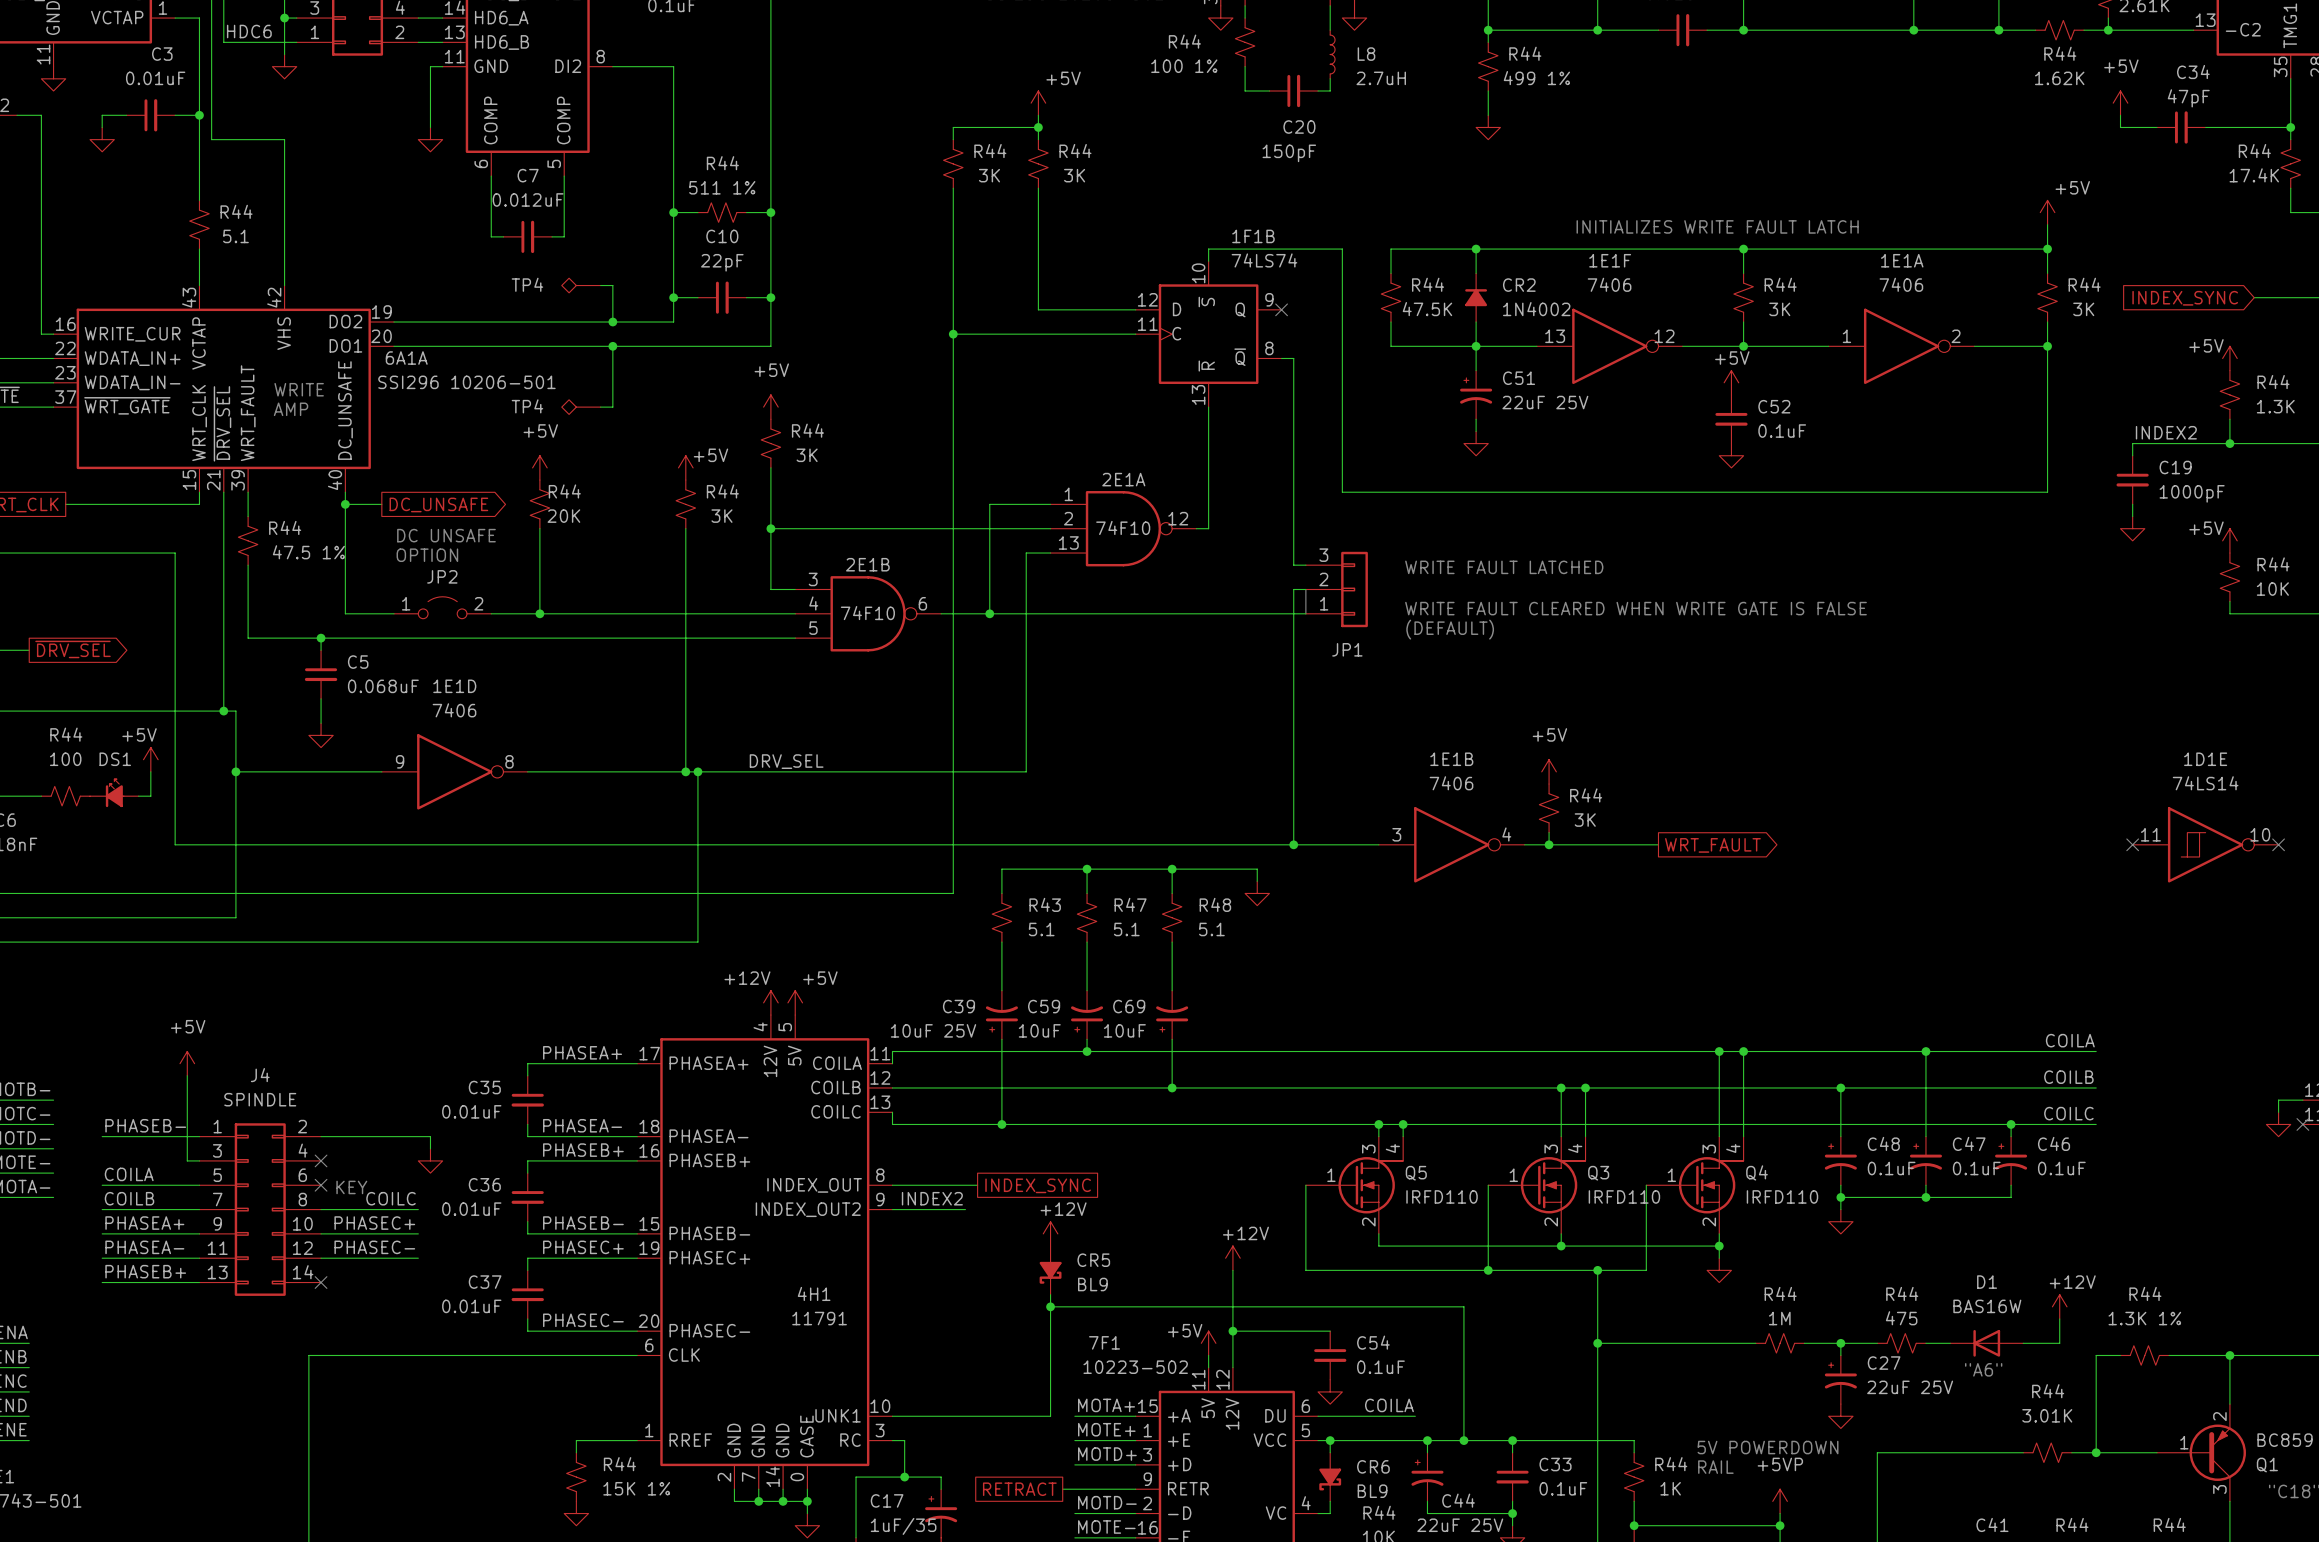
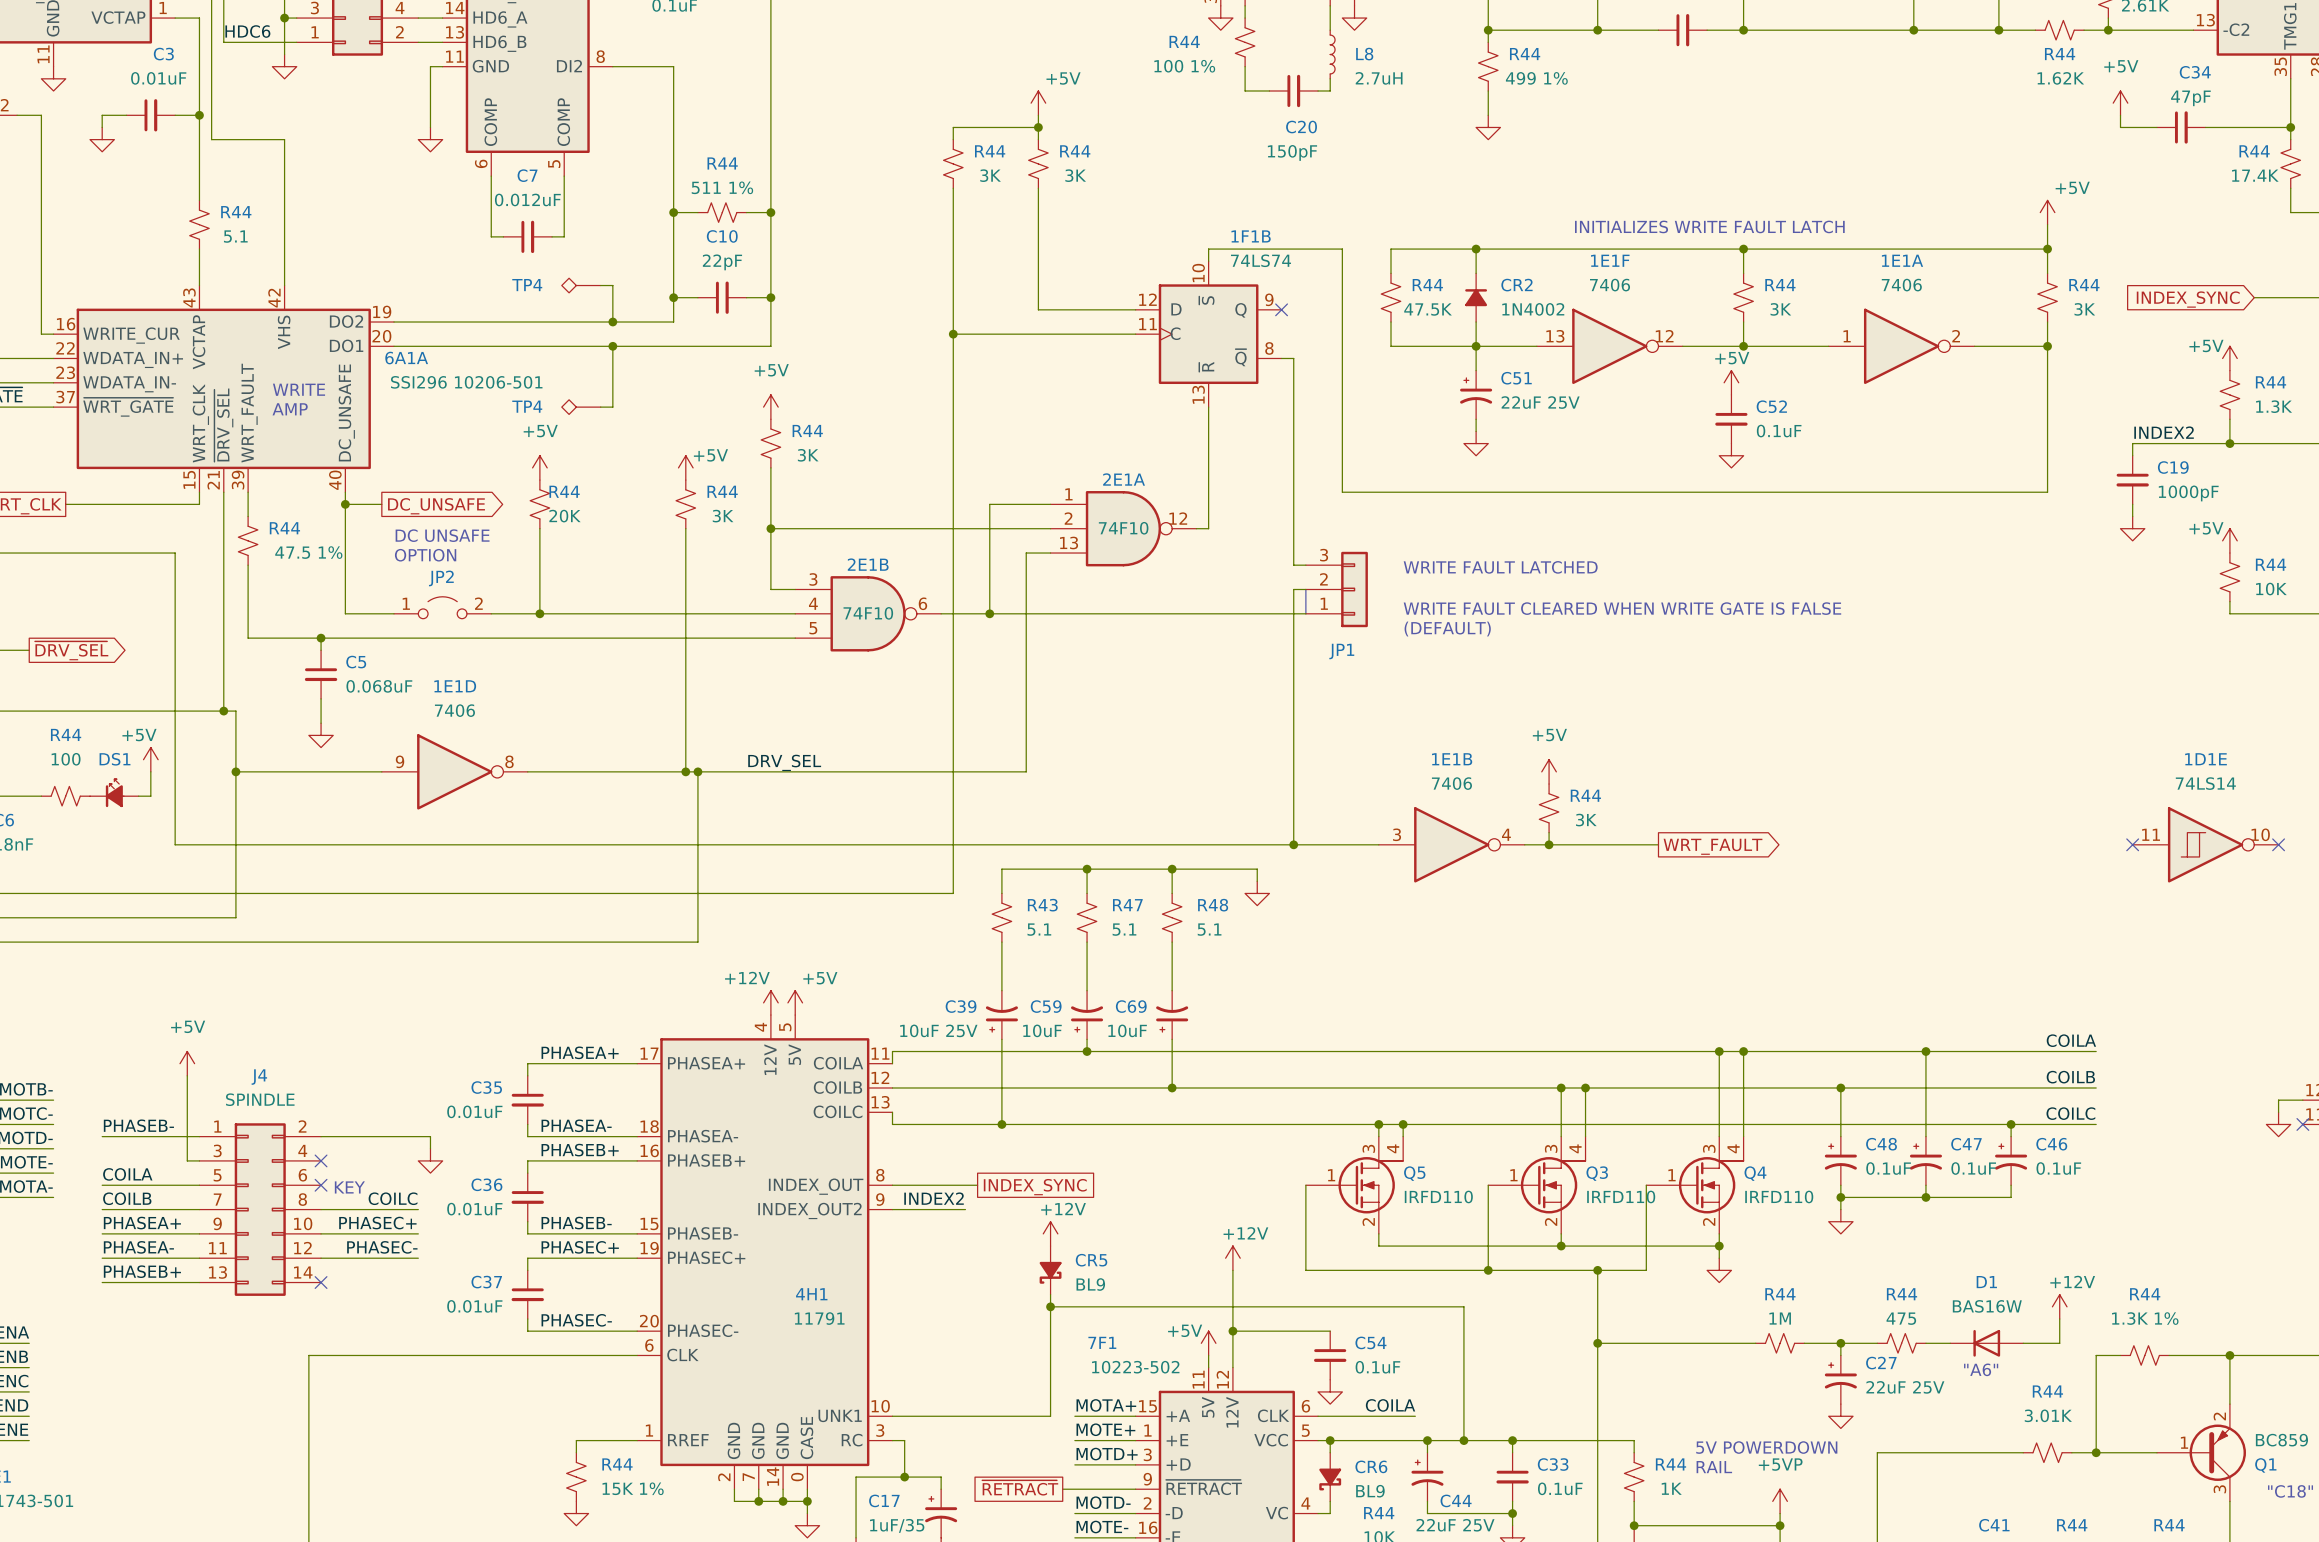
7F1 pin name: DU (1275, 1415) -> CLK (1273, 1415)
7F1 pin name: RETR (1188, 1488) -> ~{RETRACT} (1204, 1487)
global label: RETRACT (1019, 1489) -> ~{RETRACT} (1020, 1487)

